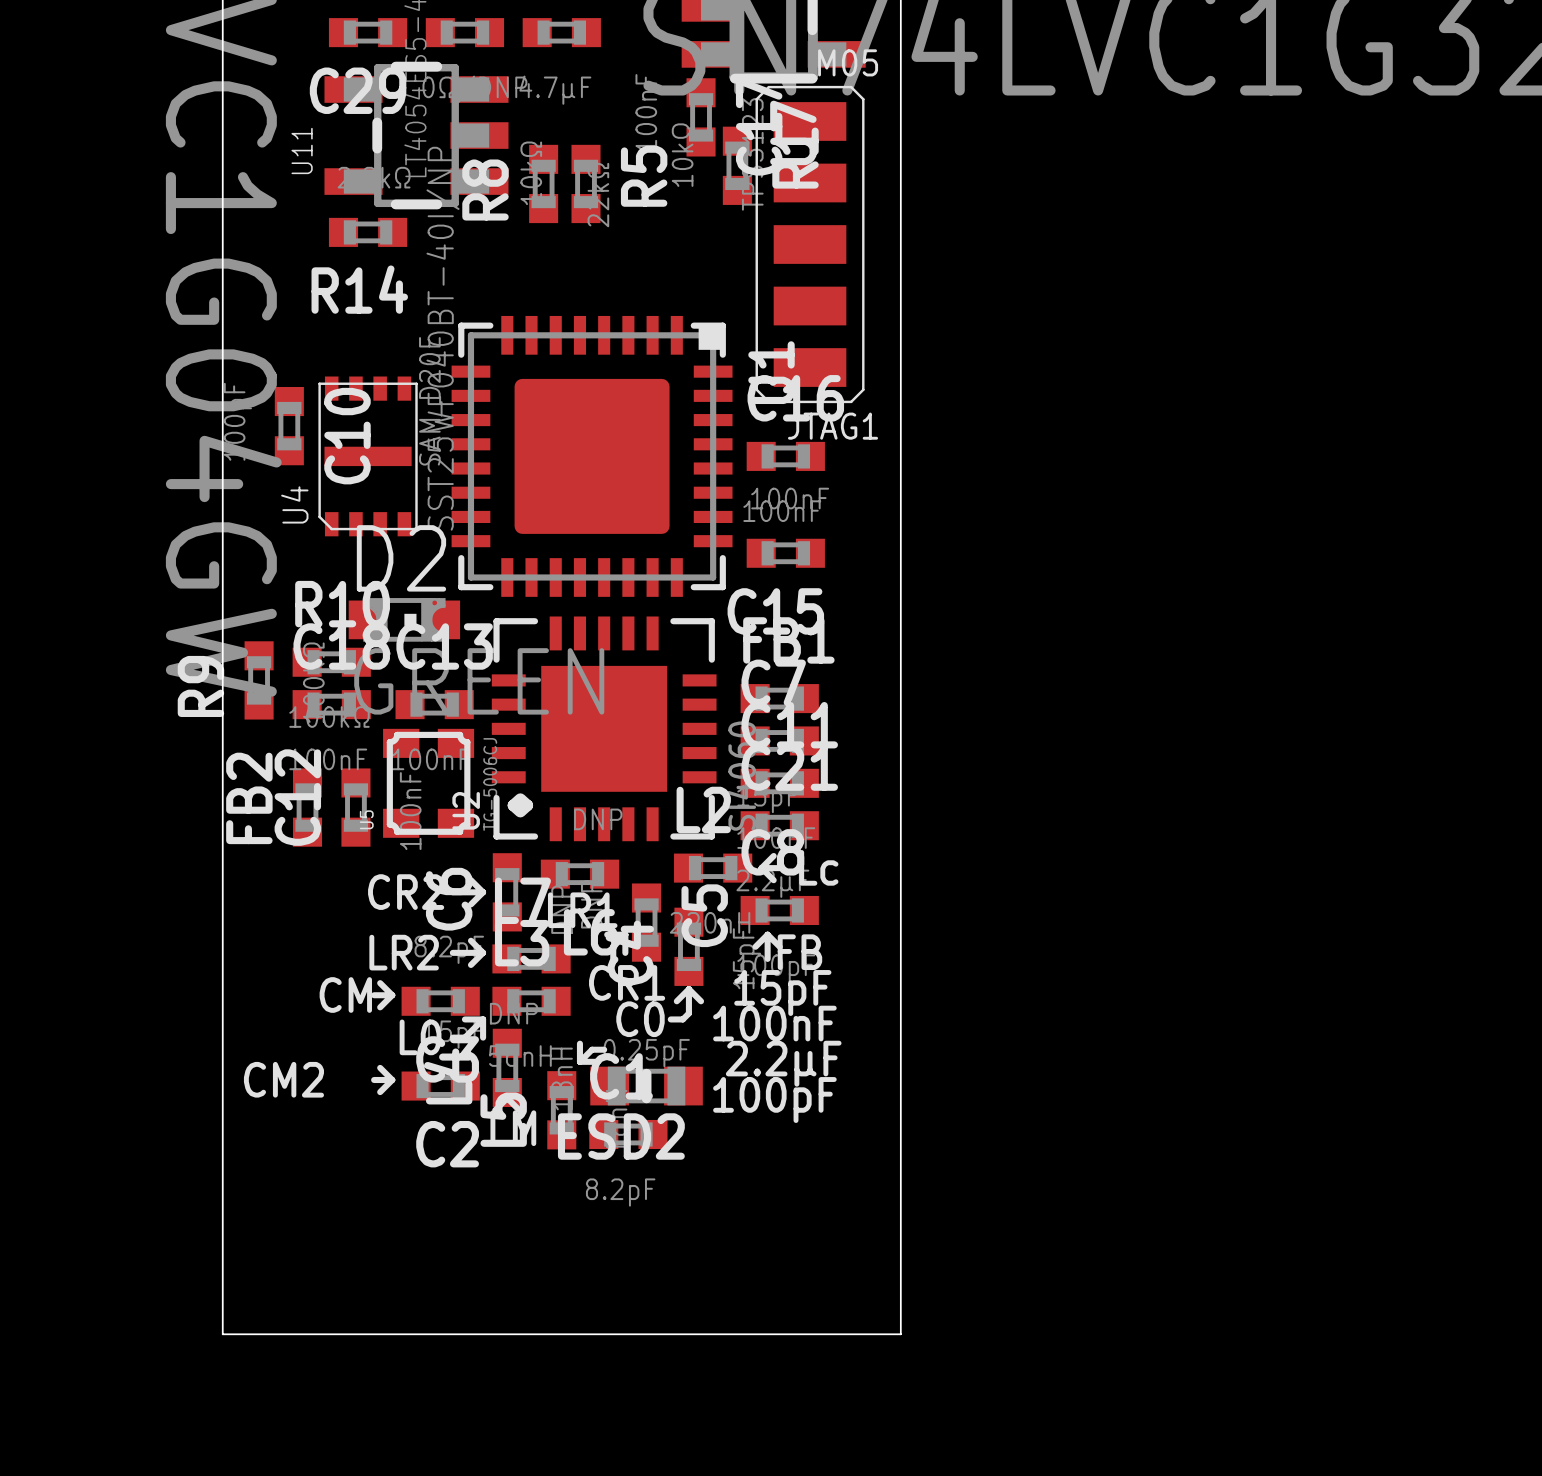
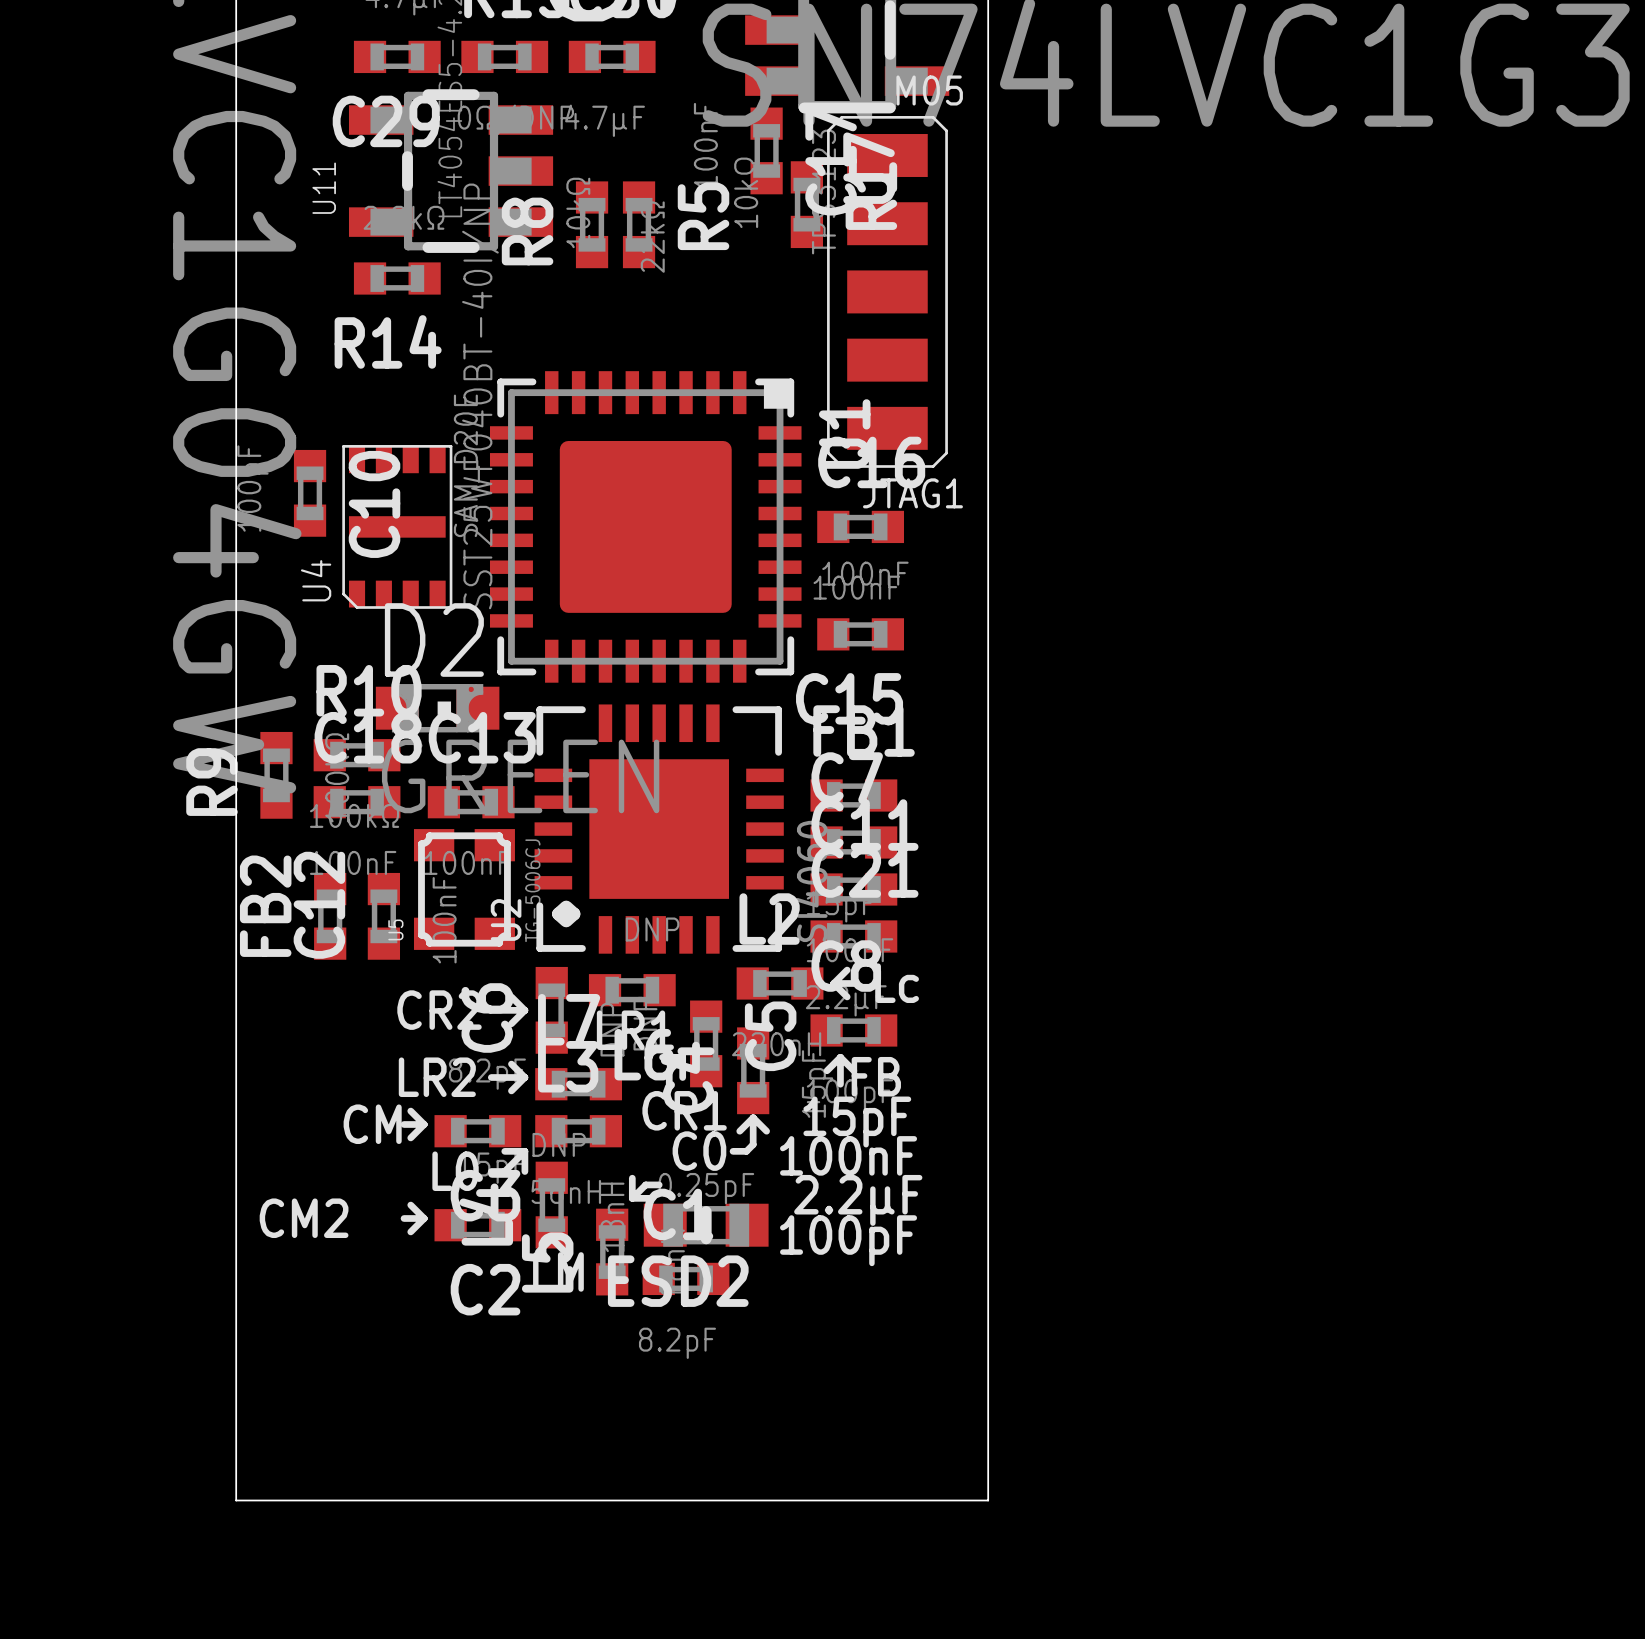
U4 footprint: [318, 376, 418, 537] -> [342, 445, 453, 609]

